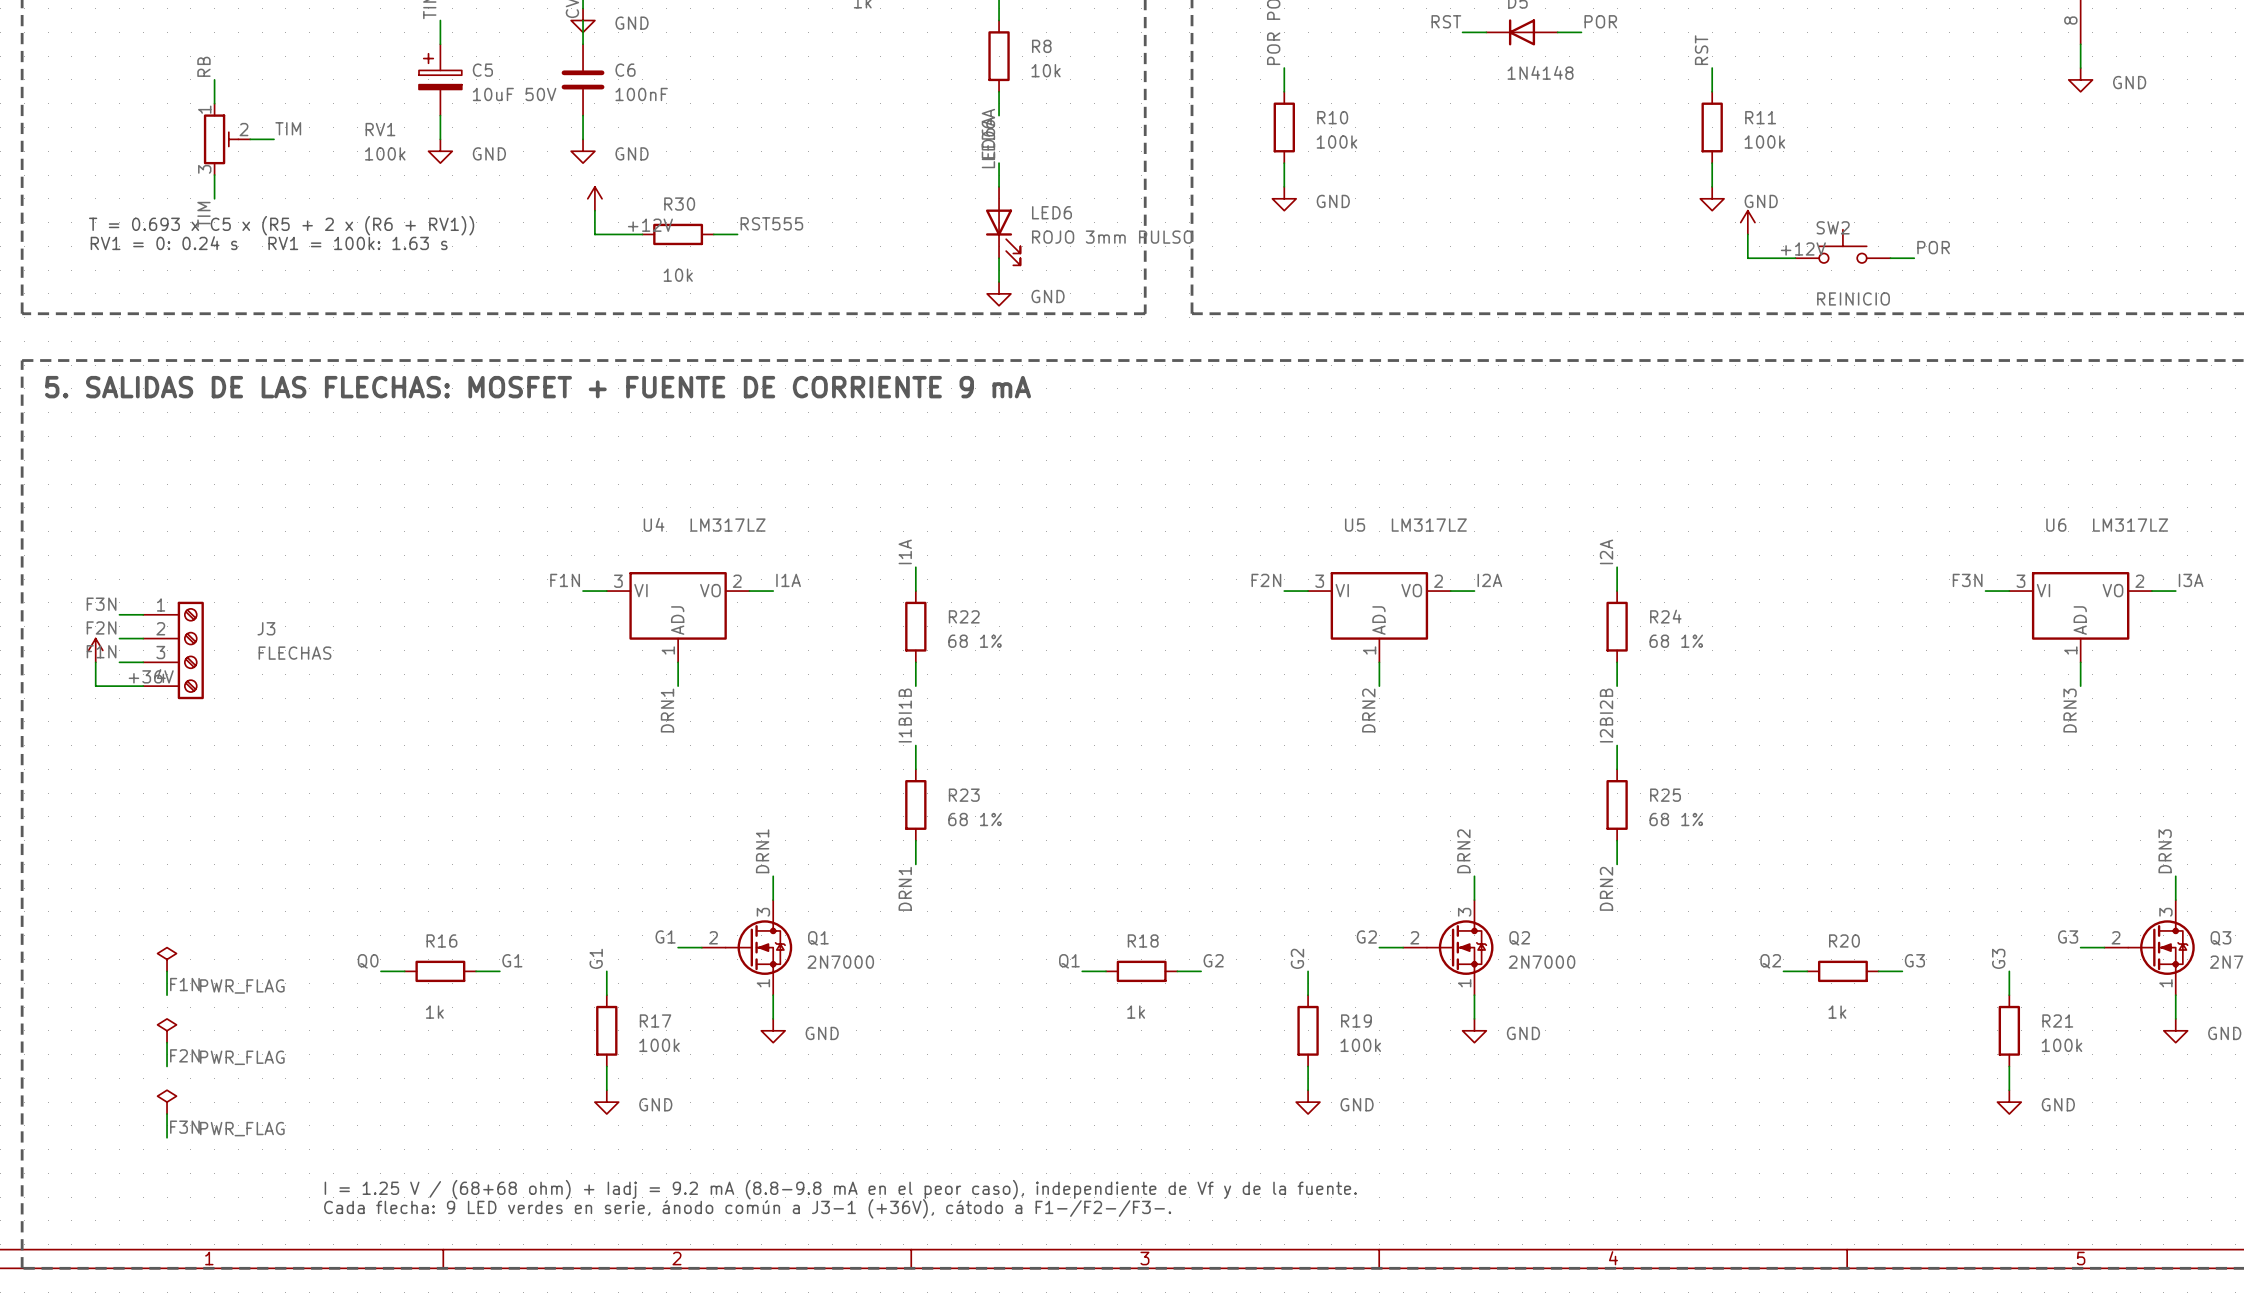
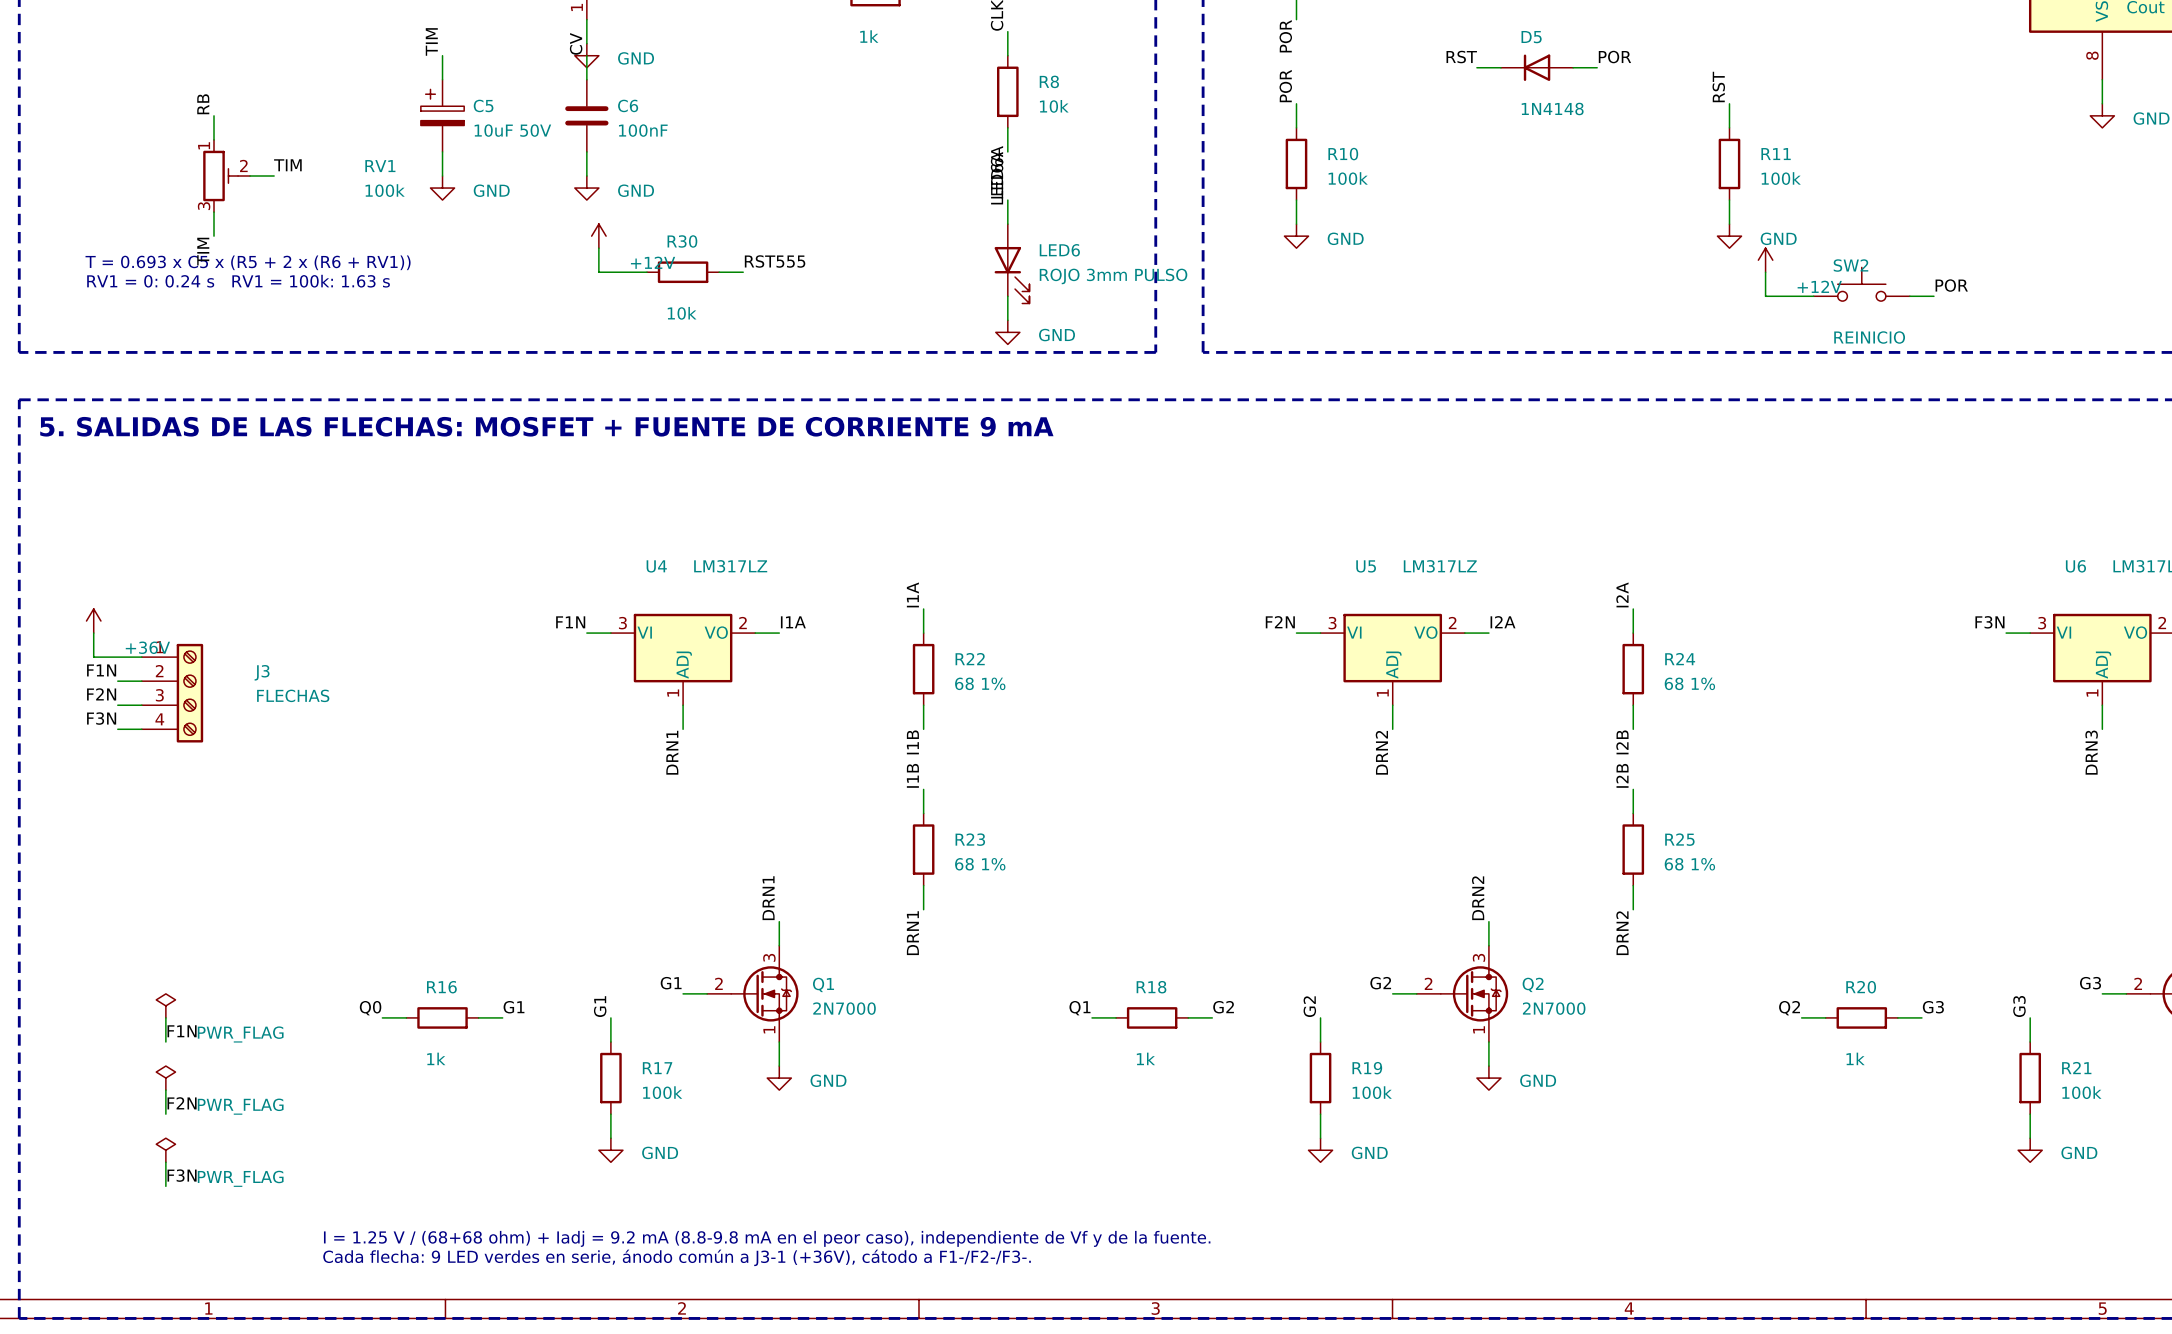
label position: F3N (101, 604) -> F3N (101, 718)
label: F2N (101, 627) -> F1N (101, 670)
power symbol position: +36V (95, 650) -> +36V (93, 621)
label: F1N (101, 651) -> F2N (101, 694)
wire: (95, 662) (95, 686) (119, 686) -> (93, 633) (93, 657) (117, 657)

